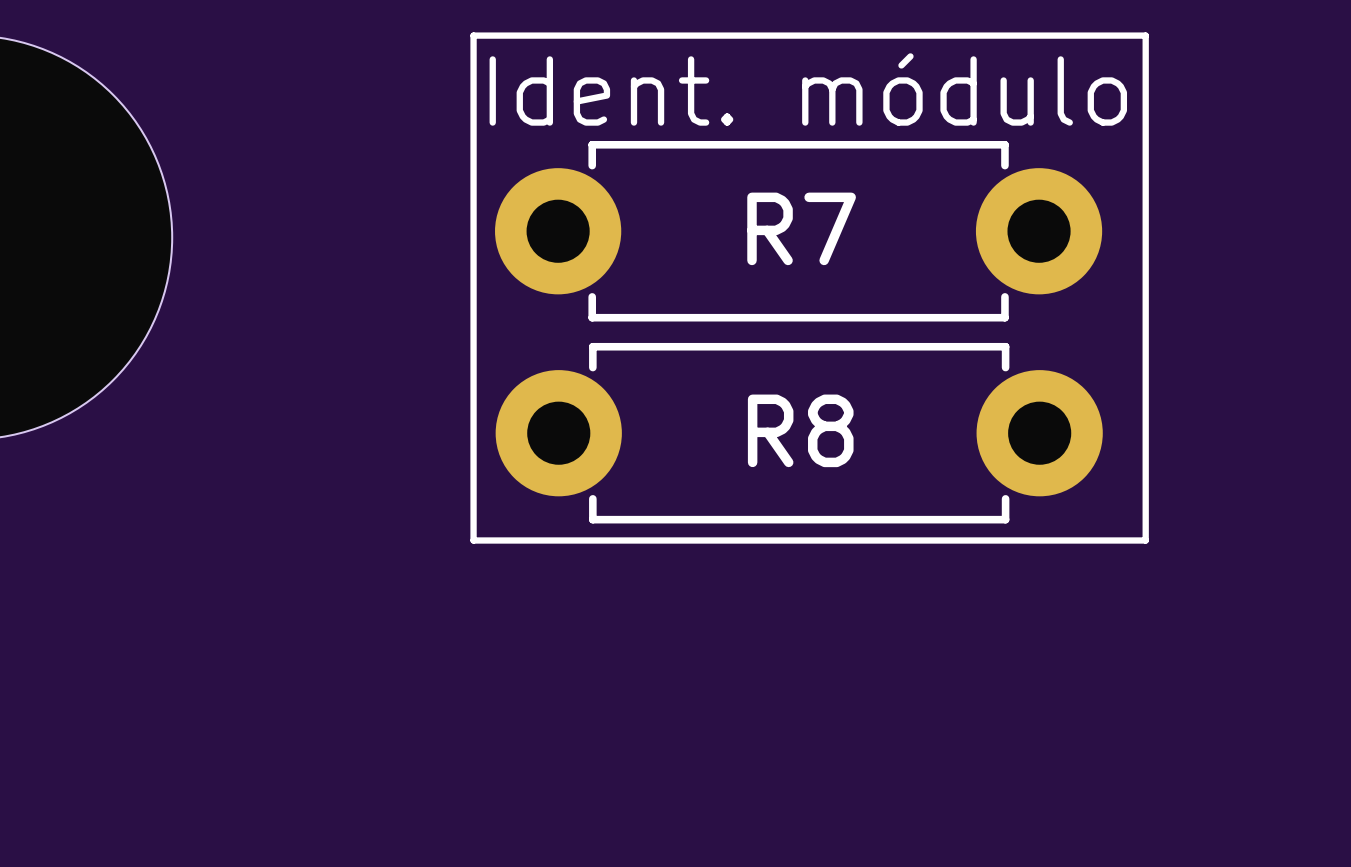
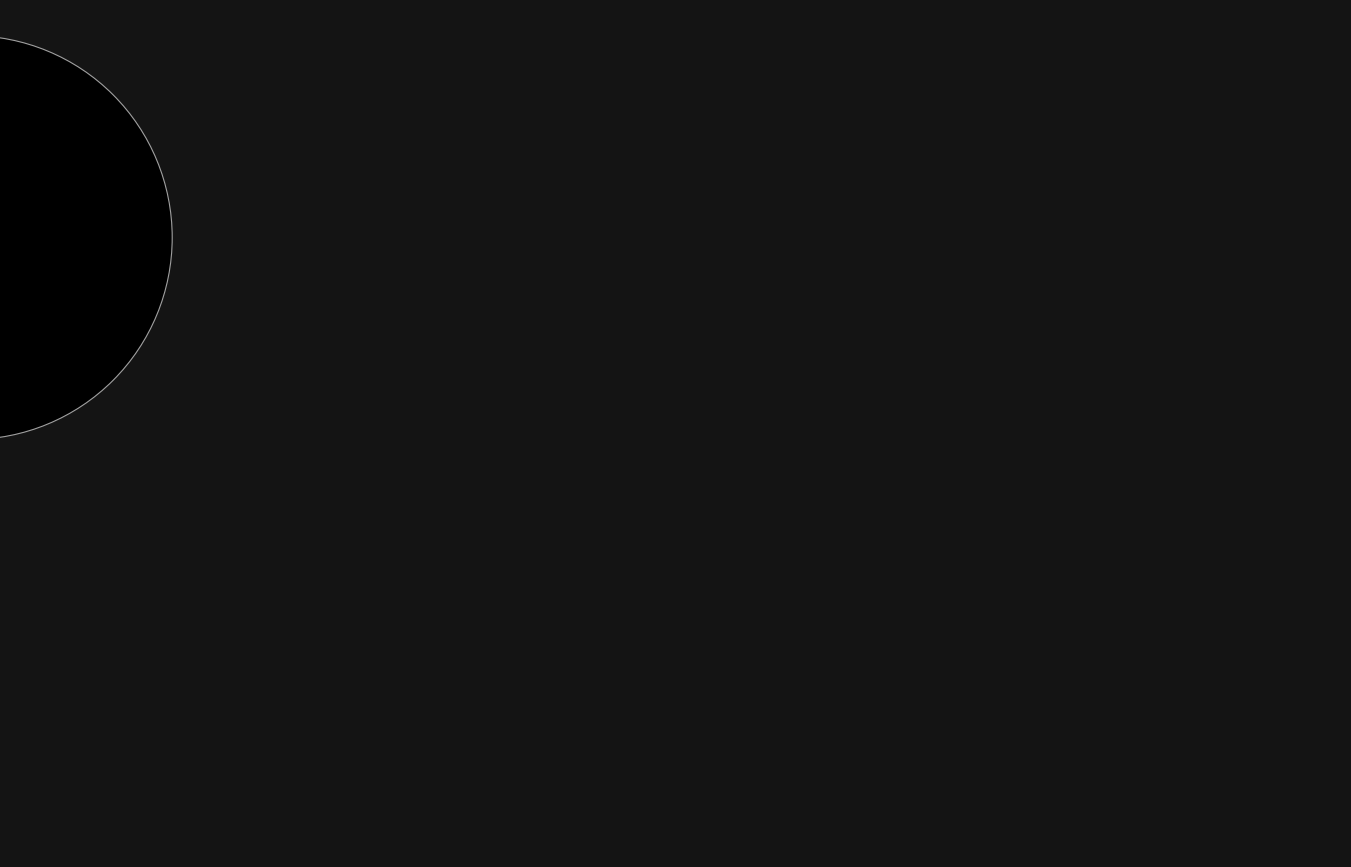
line: (473, 35) (1145, 35) (1145, 540) (473, 540) (473, 35) -> none
text: Ident. módulo (808, 89) -> none
R7: (798, 231) -> none
R8: (799, 433) -> none

